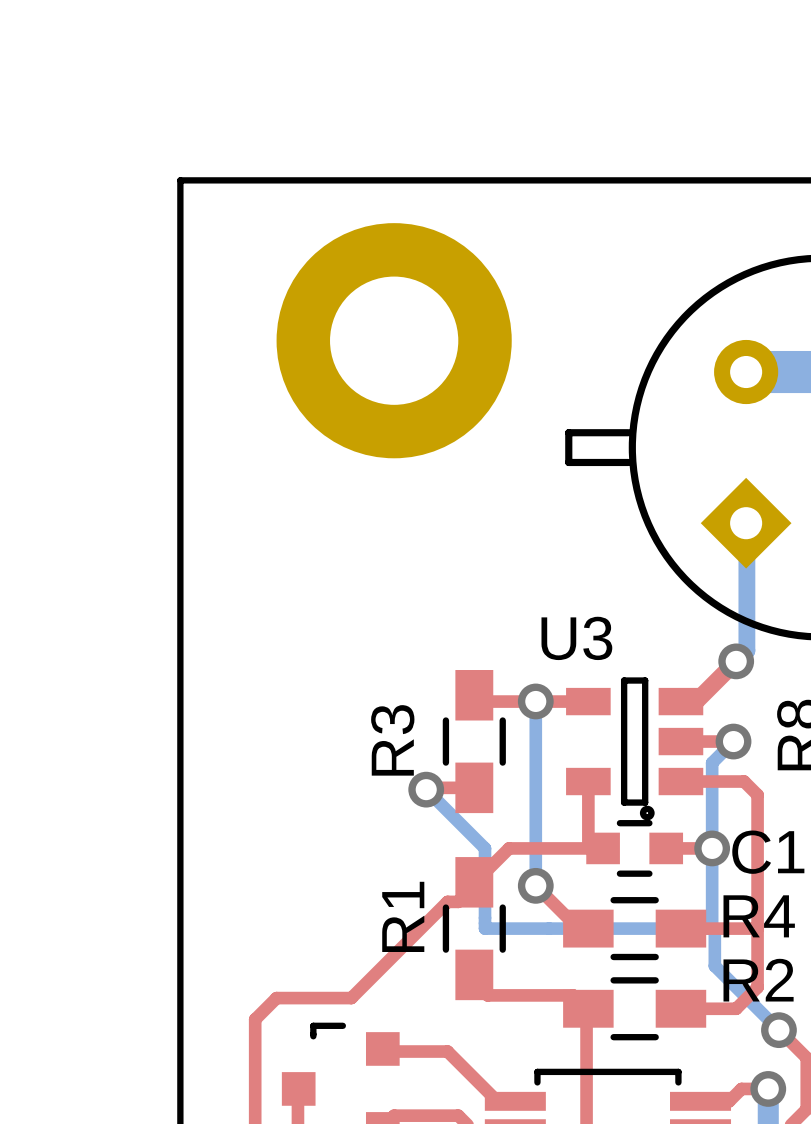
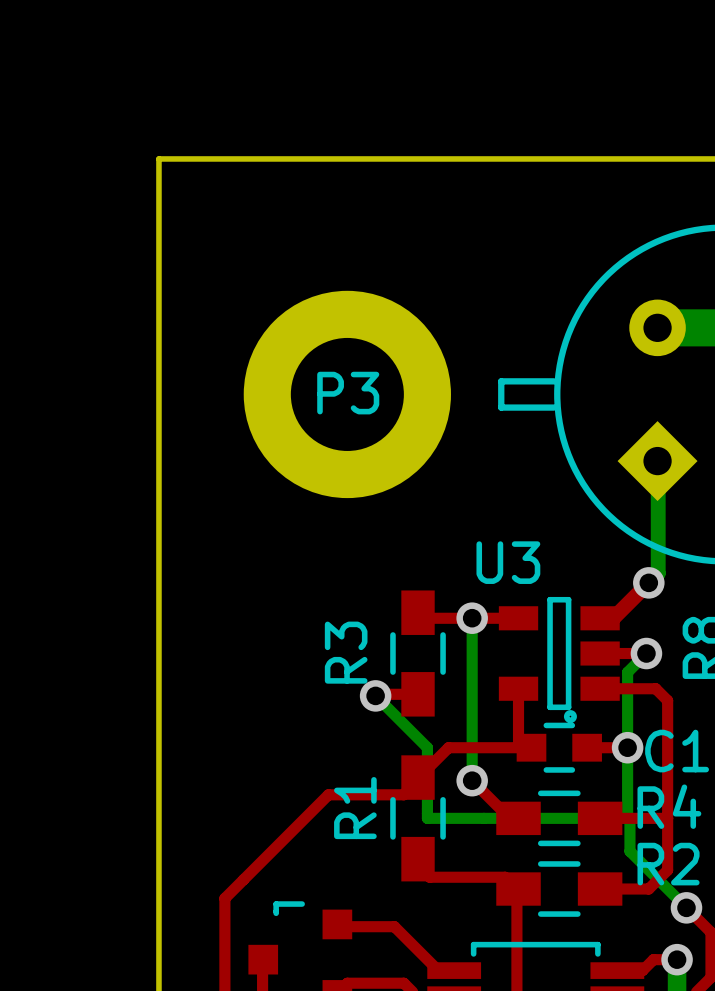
part: (394, 340) -> none
P3: none -> (347, 394)
top track: (447, 901) (351, 998) (276, 998) -> (394, 794) (328, 794) (243, 879)

